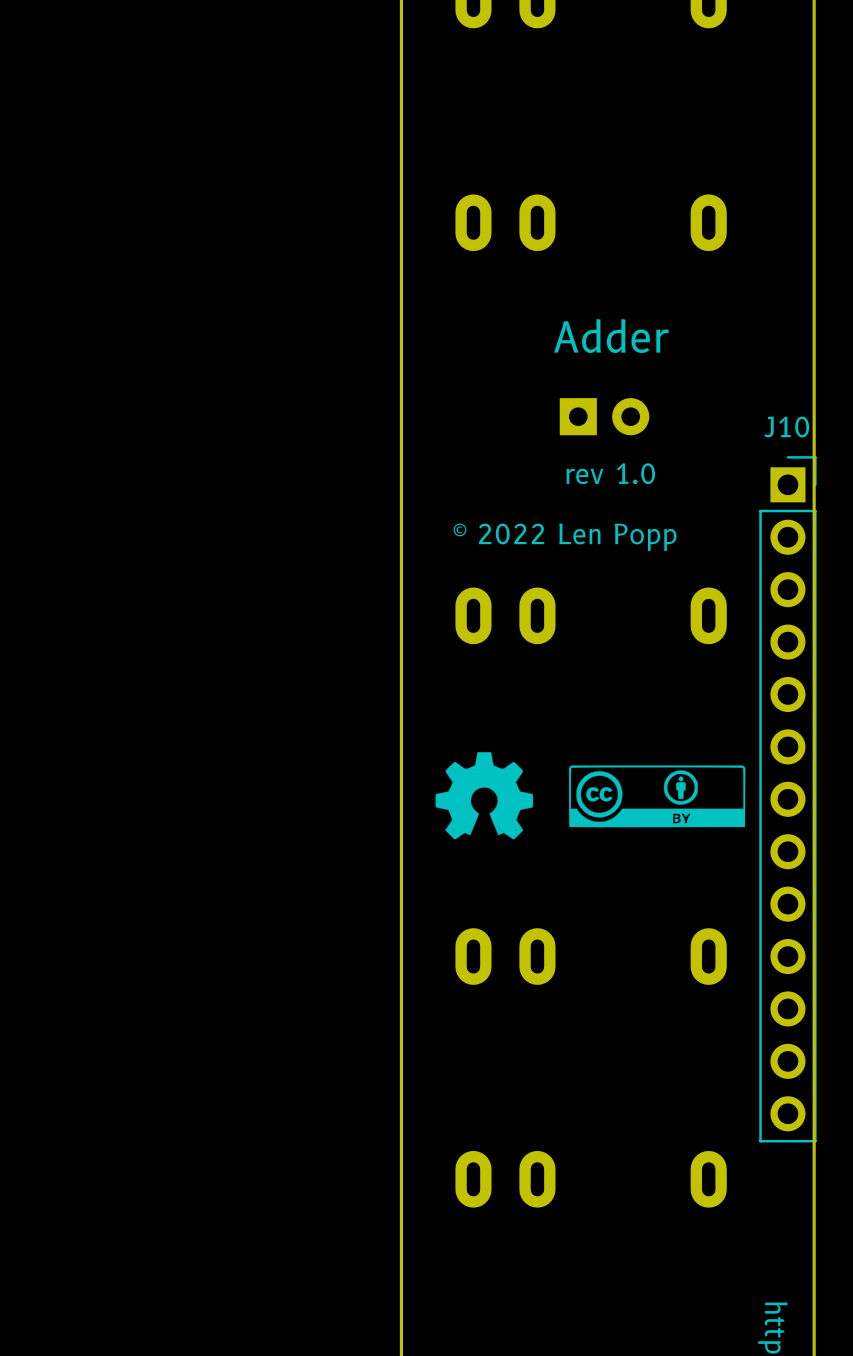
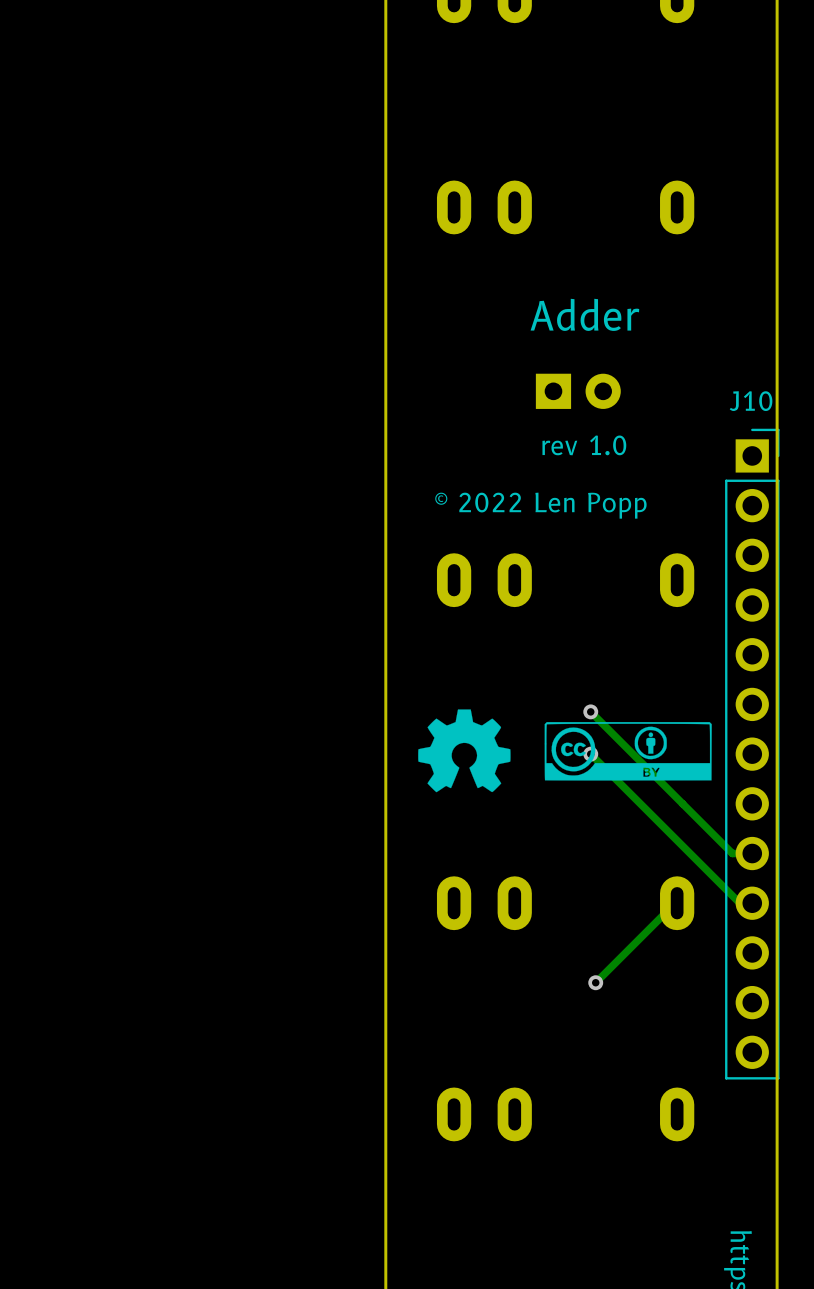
track: none -> (590, 711) (732, 853) (752, 853)
via: none -> (590, 711)
track: none -> (590, 754) (739, 903) (752, 903)
via: none -> (590, 754)
track: none -> (677, 903) (595, 982)
via: none -> (595, 982)

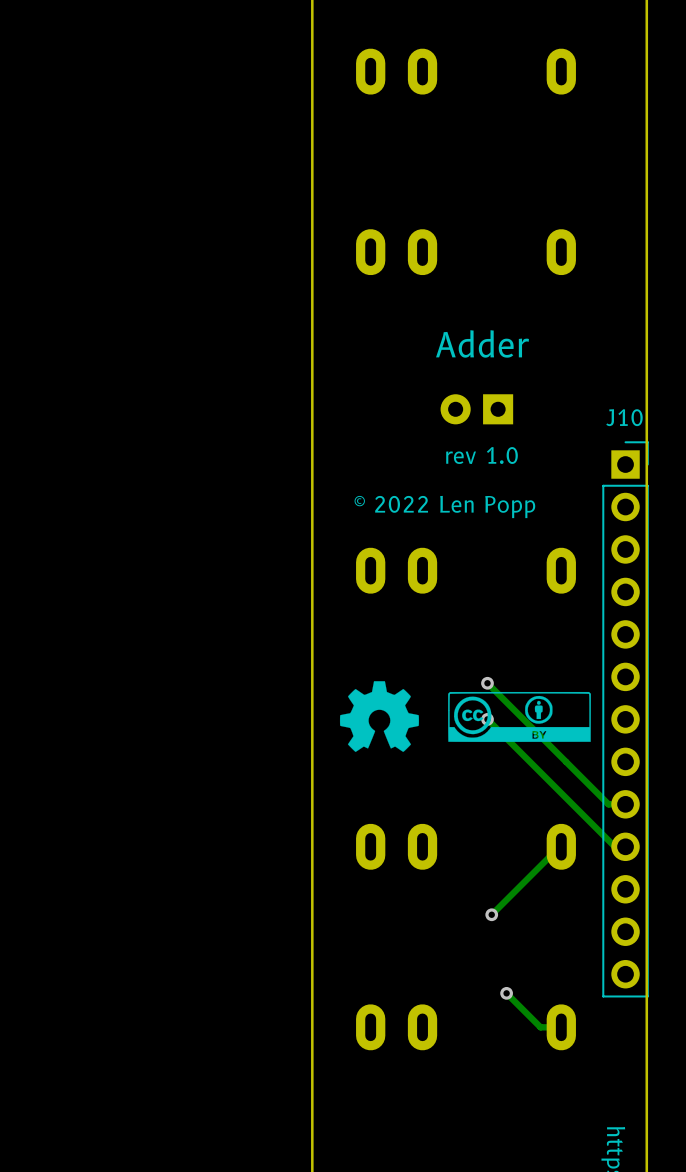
part rotation: 0° (578, 391) -> 180° (476, 409)
track: none -> (506, 993) (540, 1027) (561, 1027)
via: none -> (506, 993)

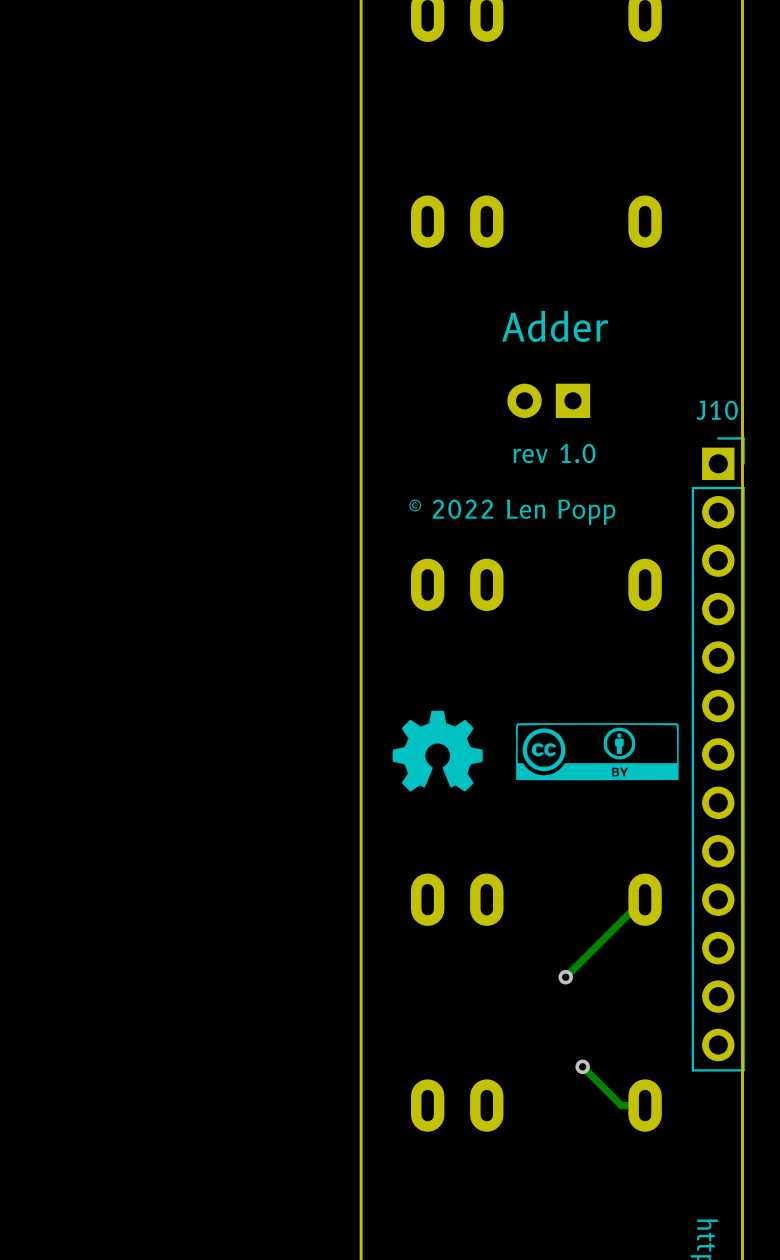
track: (487, 683) (608, 804) (625, 804) -> none
via: (487, 683) -> none
track: (487, 719) (614, 846) (625, 846) -> none
via: (487, 719) -> none

